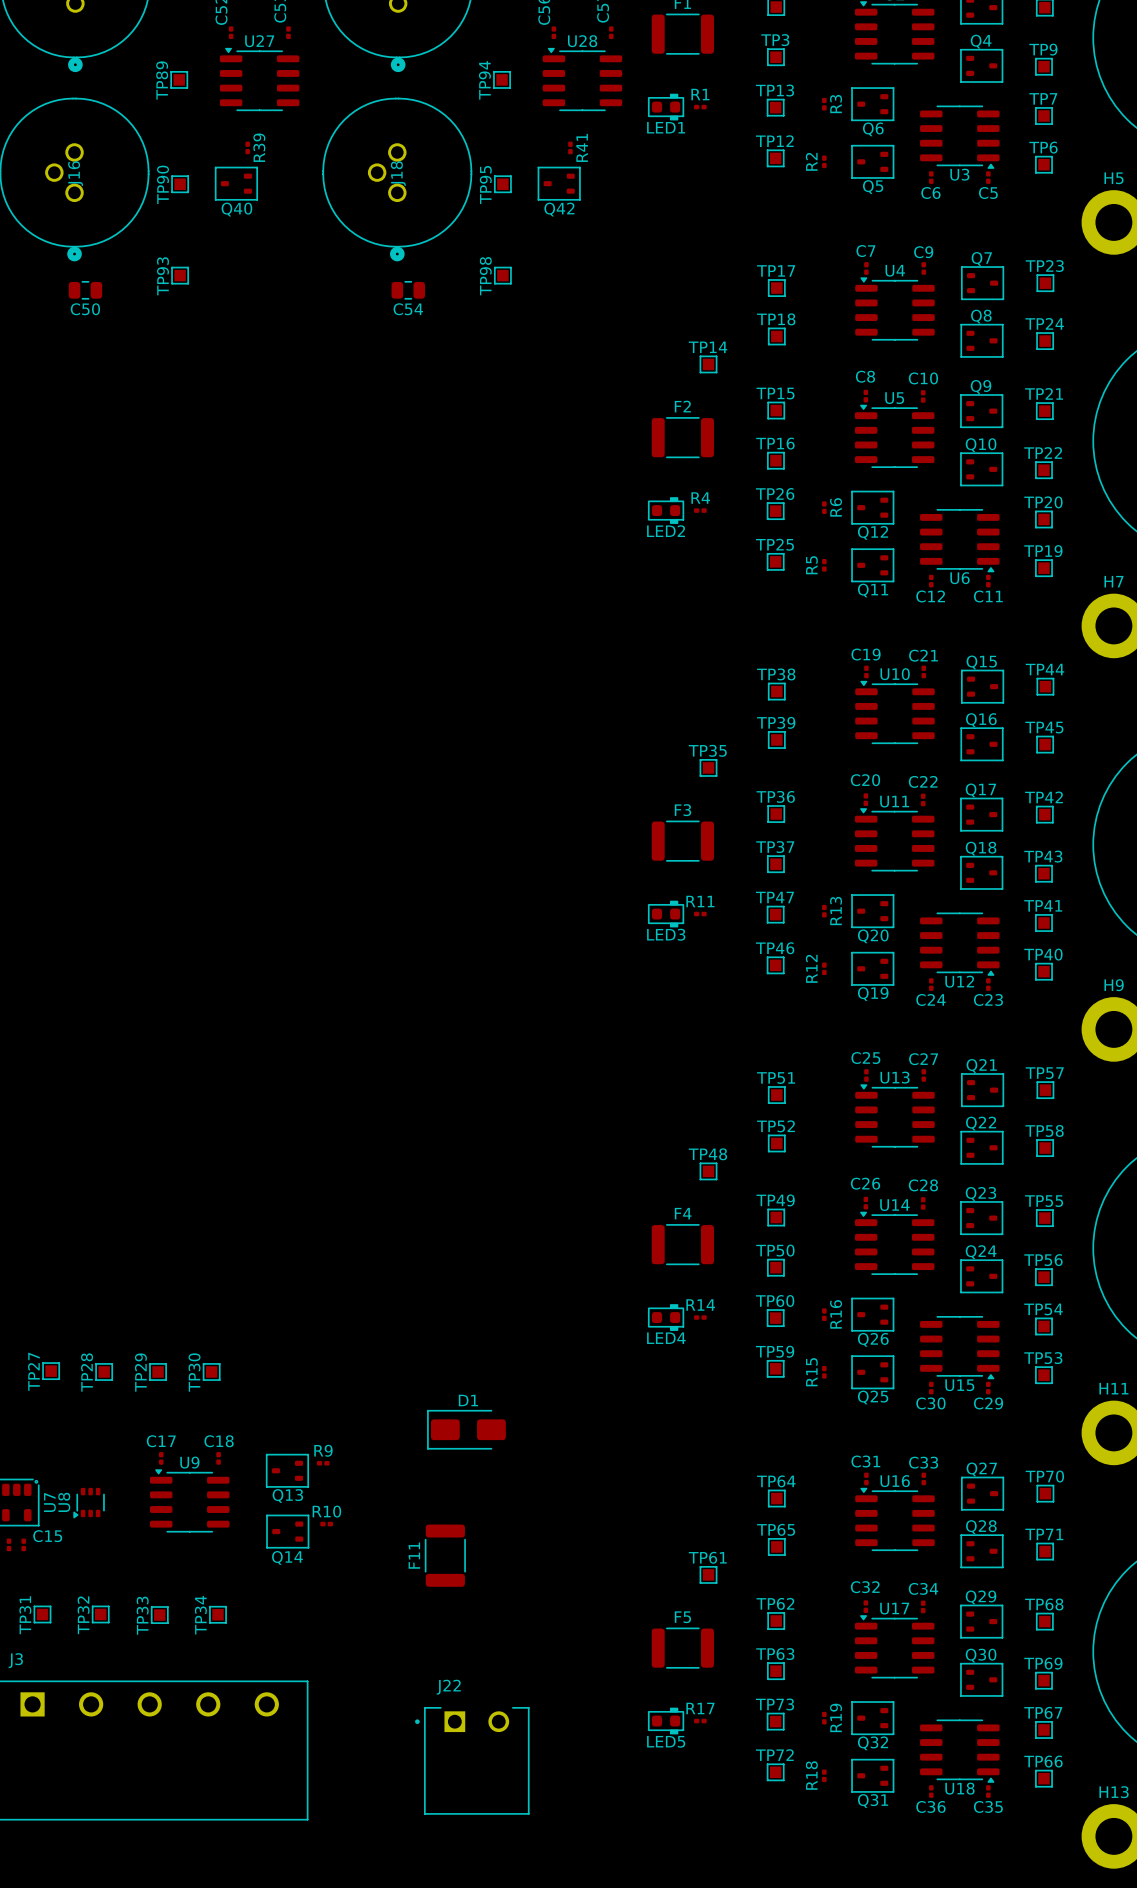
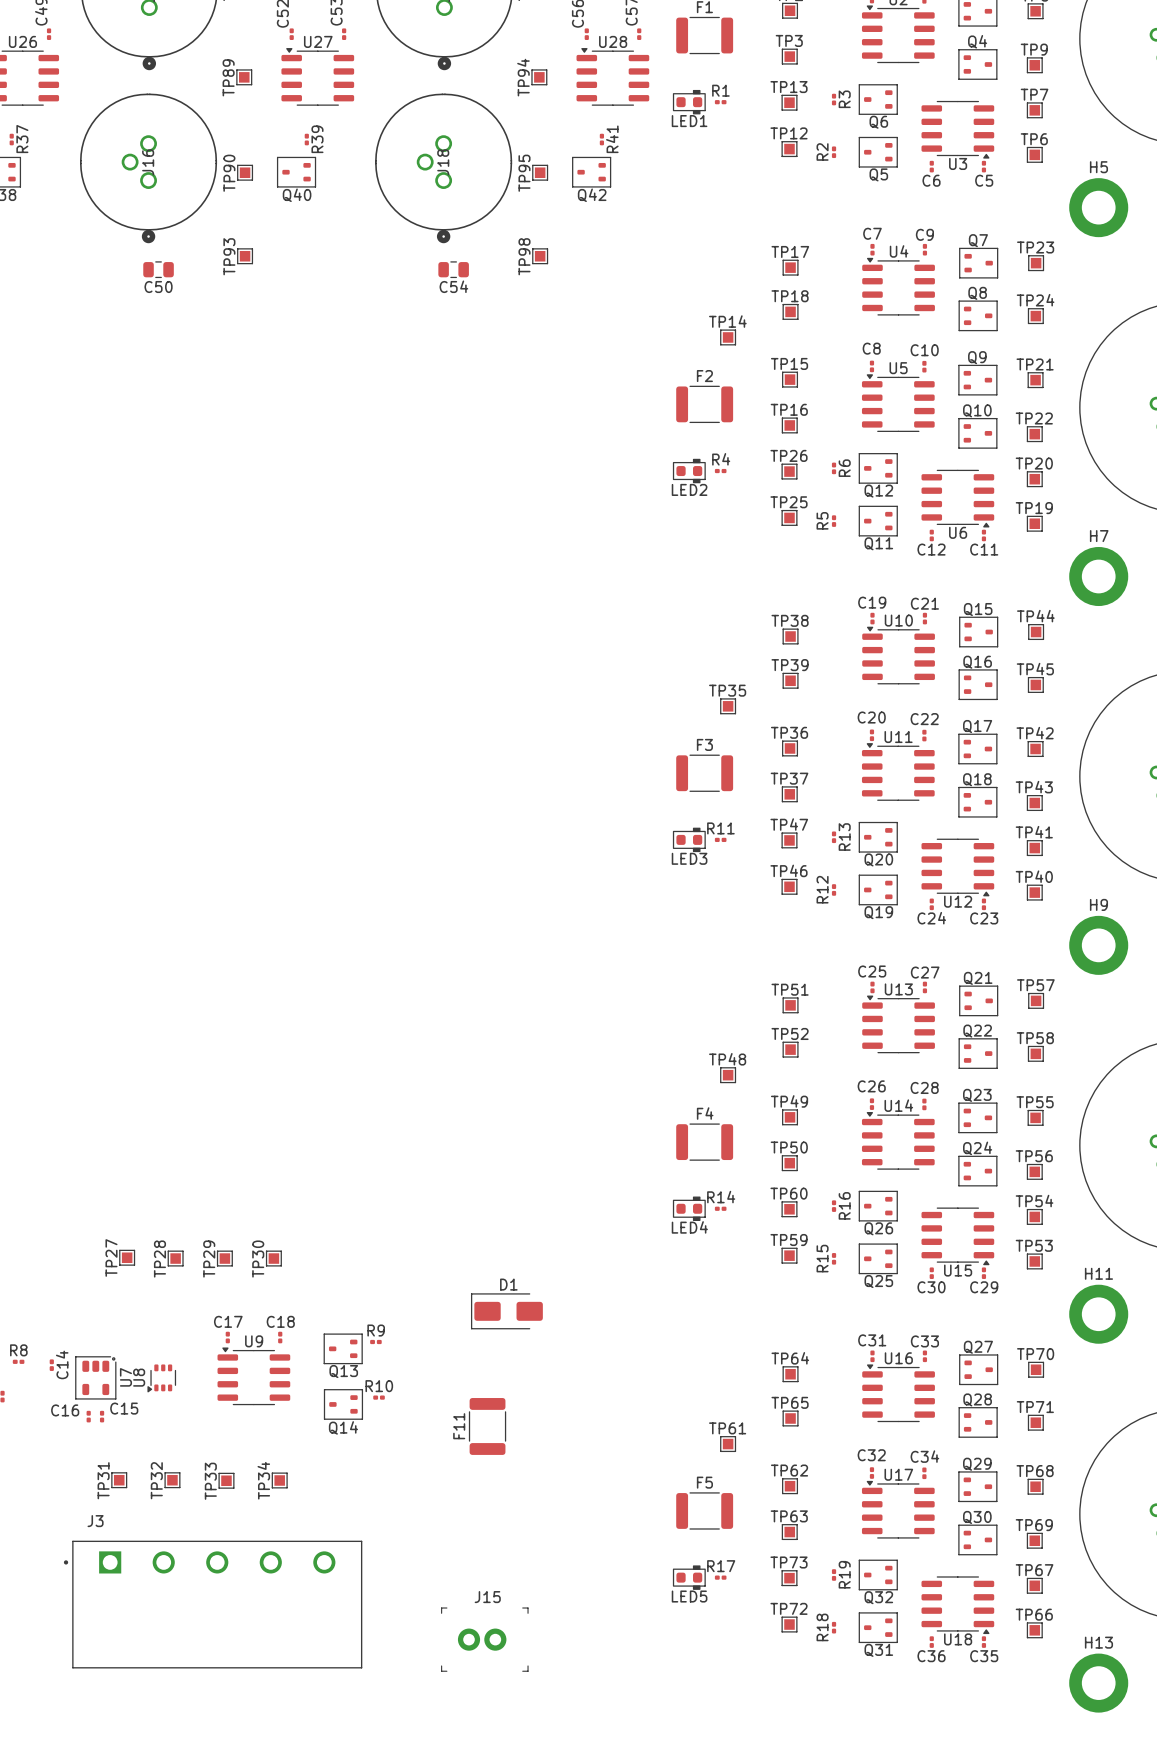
J22: (472, 1760) -> none
J15: none -> (484, 1639)

